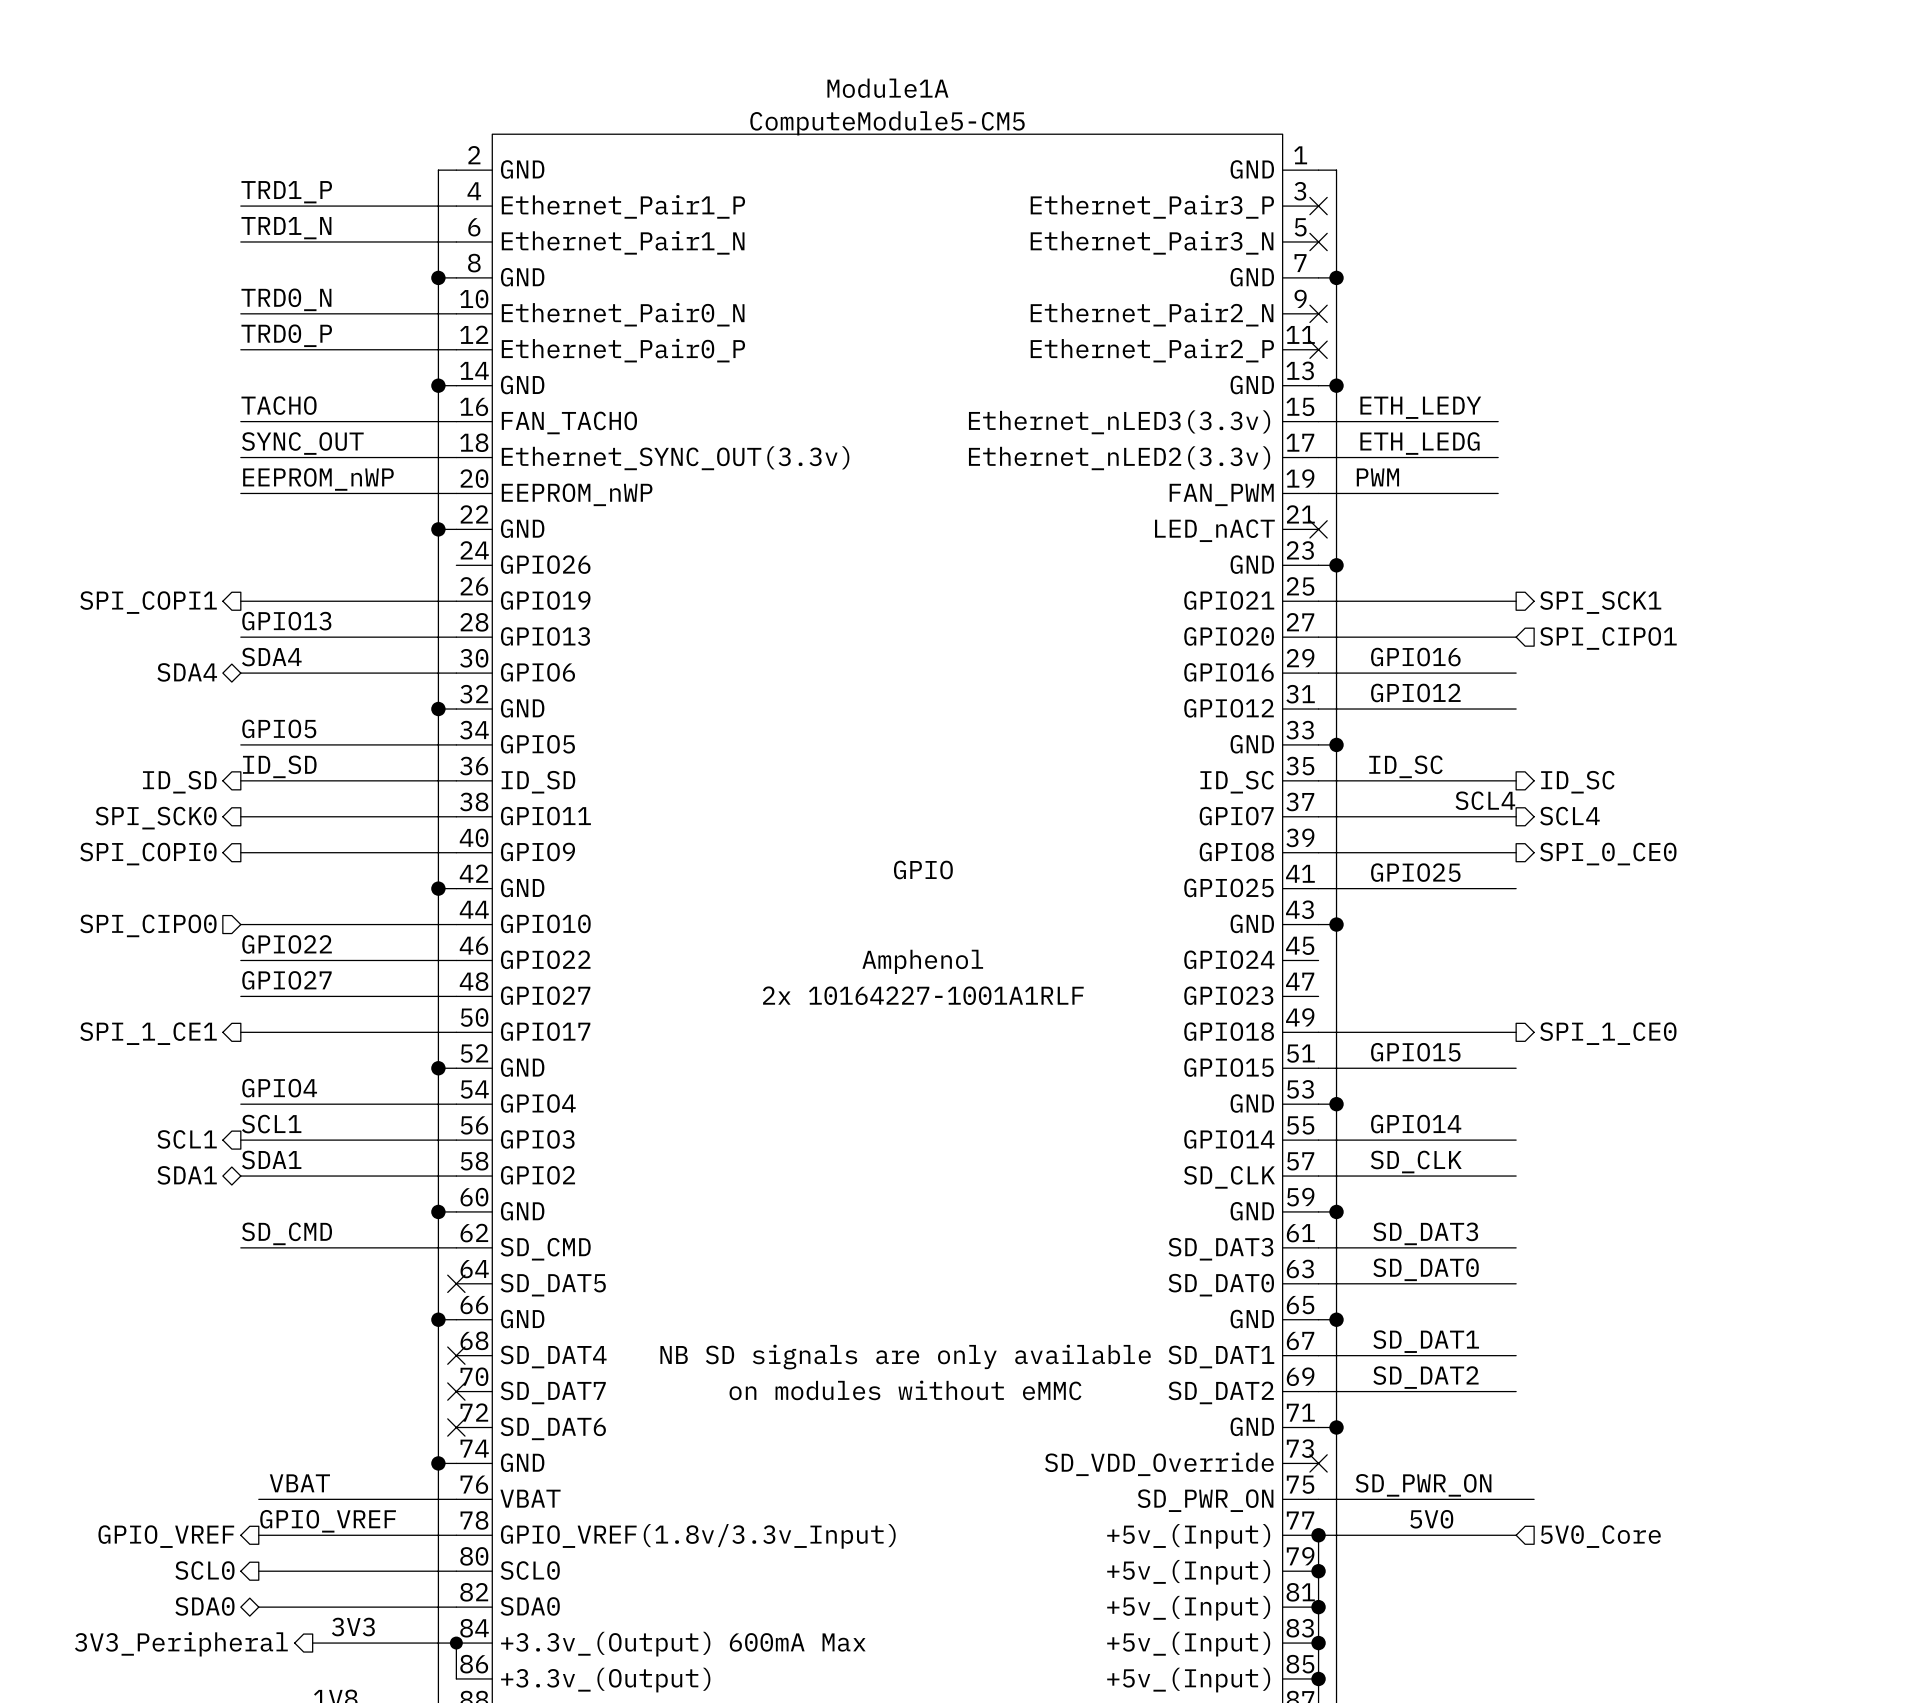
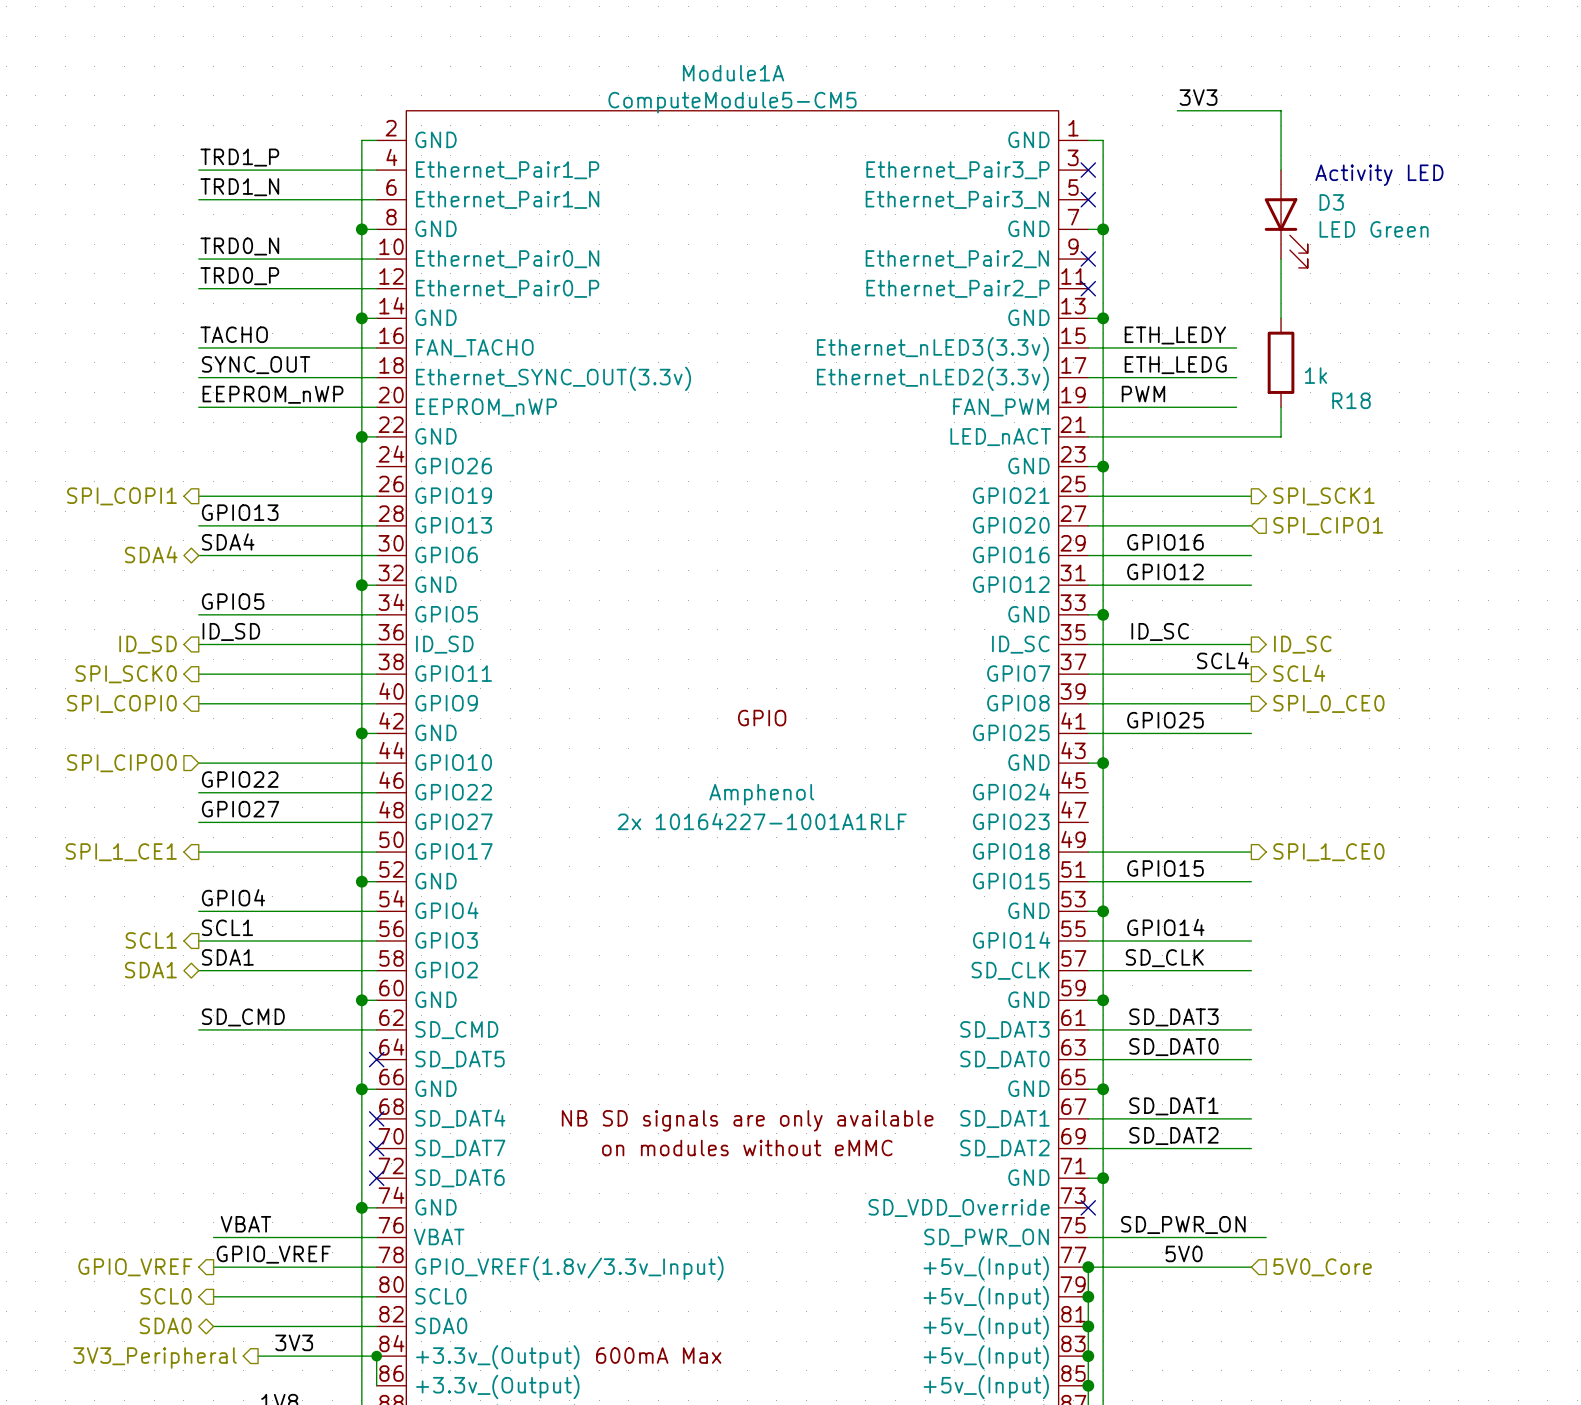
label: none -> 3V3 (1198, 97)
wire: none -> (1177, 110) (1281, 110) (1281, 170)
text: none -> Activity LED (1379, 175)
D3: none -> LED Green (1286, 219)
wire: none -> (1281, 259) (1281, 318)
R18: none -> 1k (1281, 362)
wire: none -> (1281, 407) (1281, 436) (1088, 436)
no-connect mark: (1318, 529) -> none

